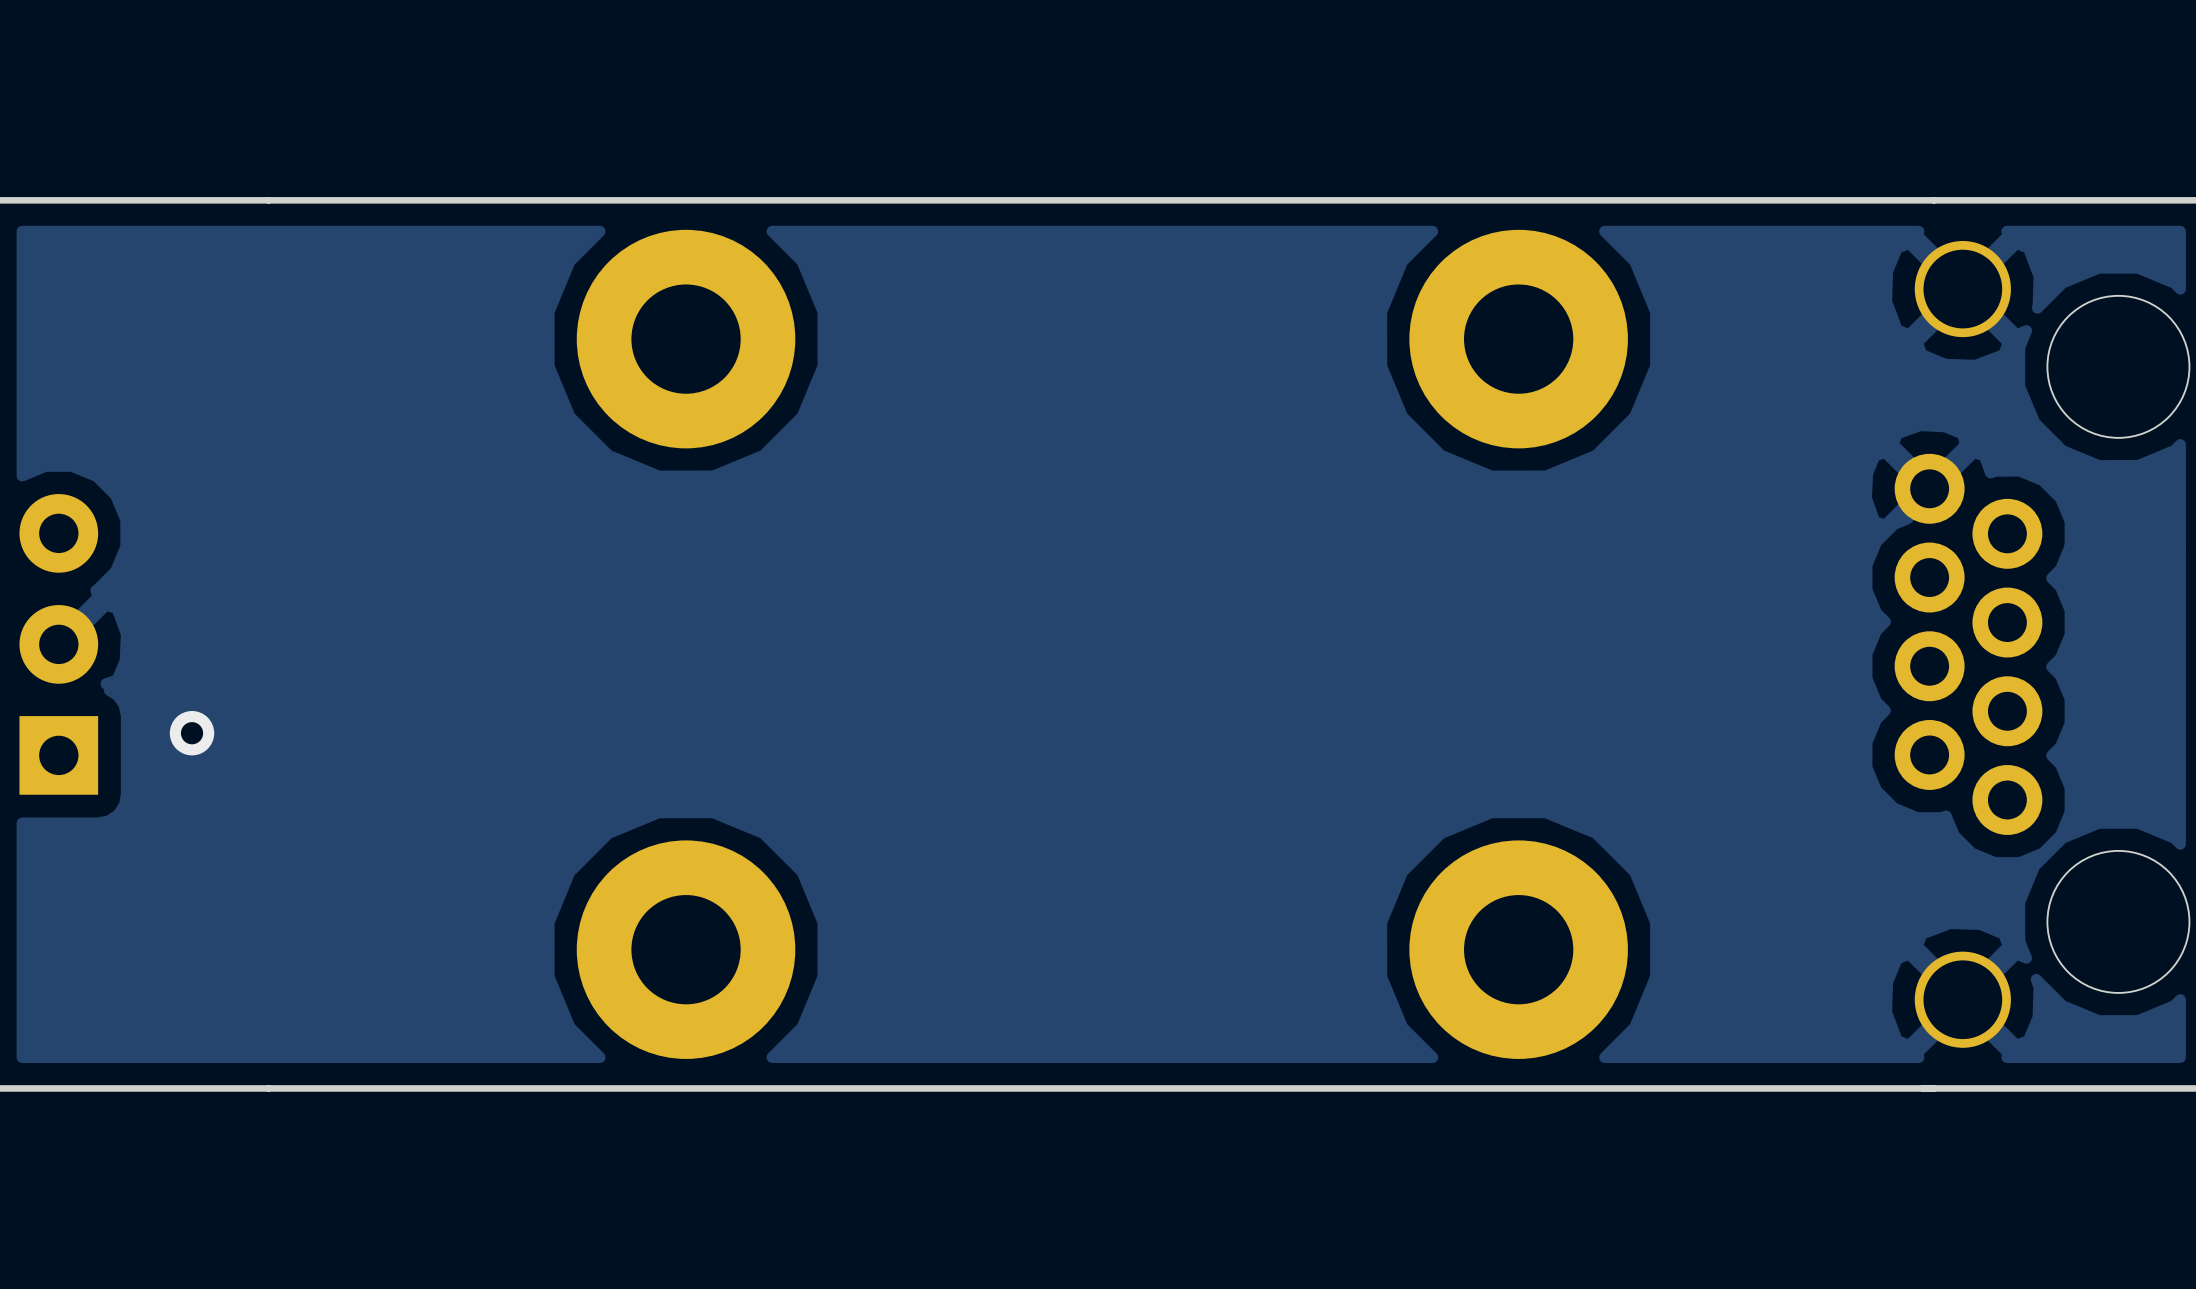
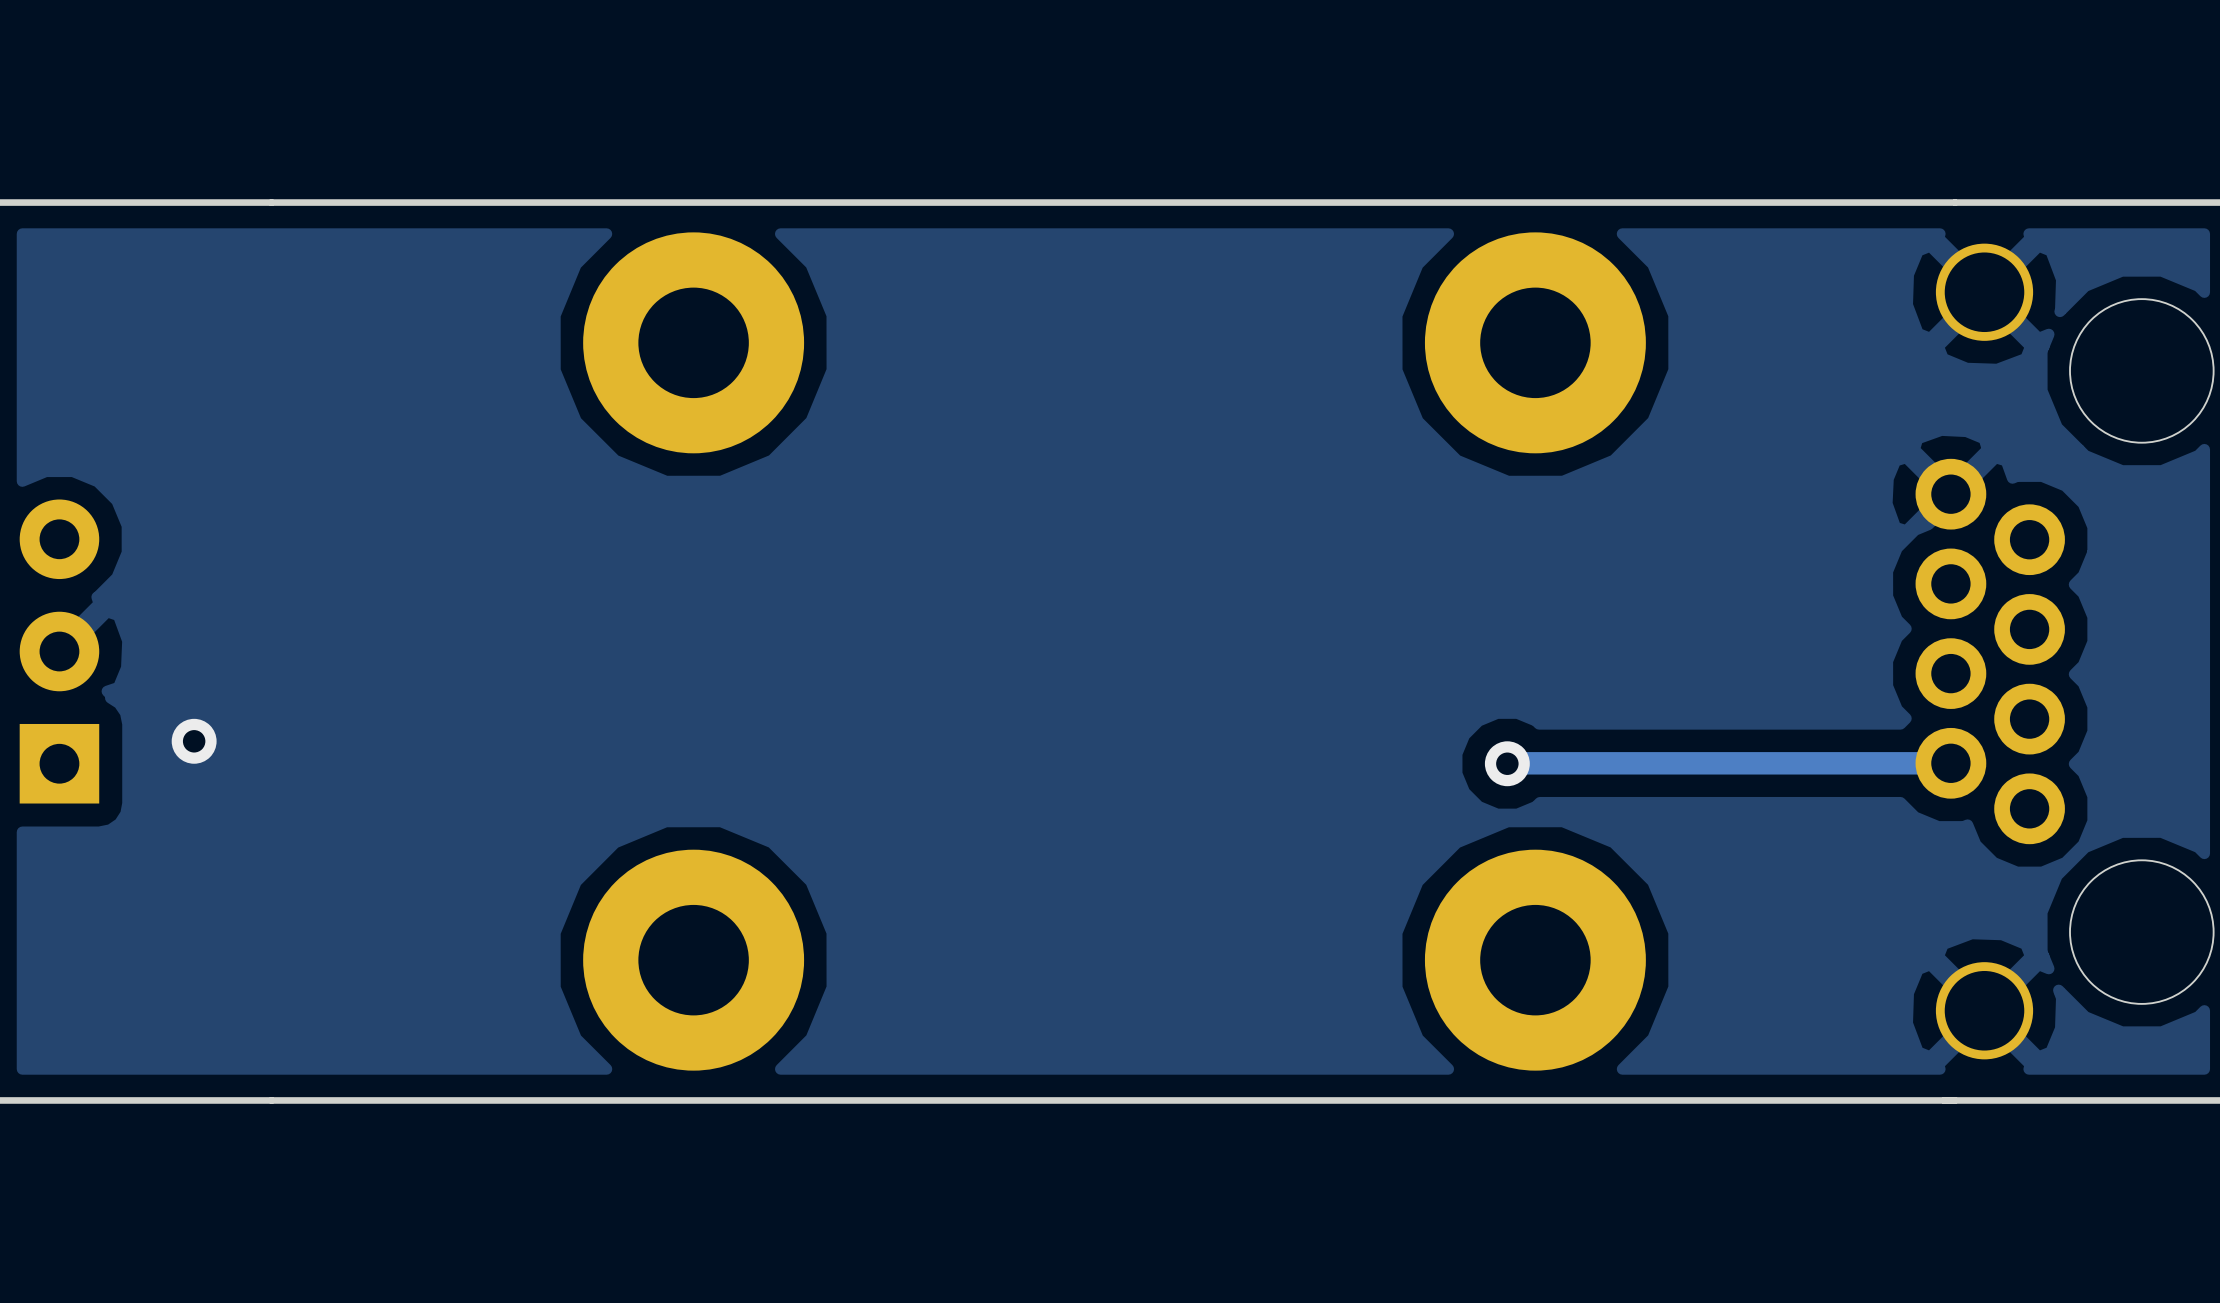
track: none -> (1950, 763) (1507, 763)
via: none -> (1507, 763)

